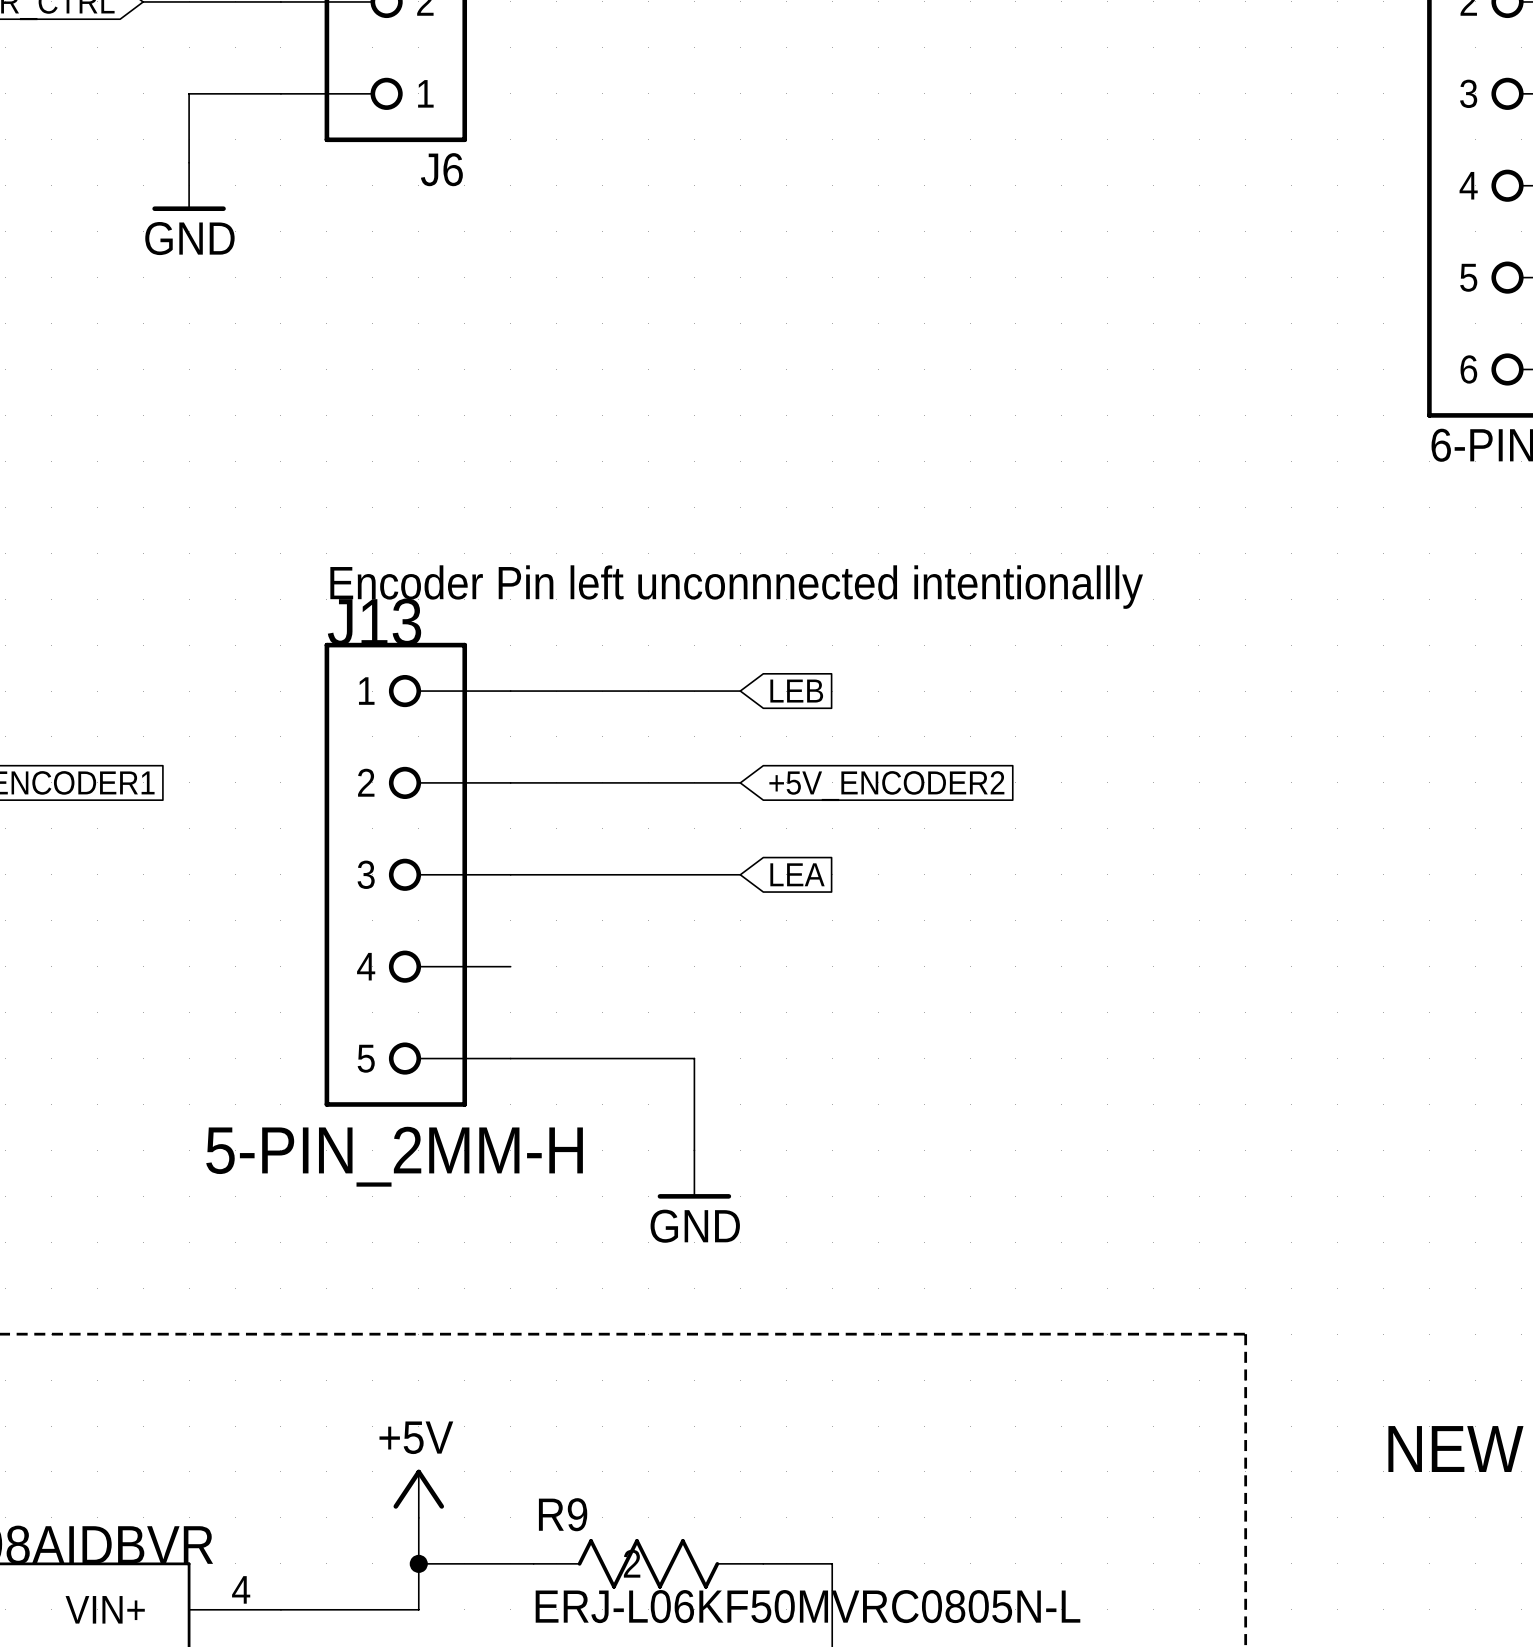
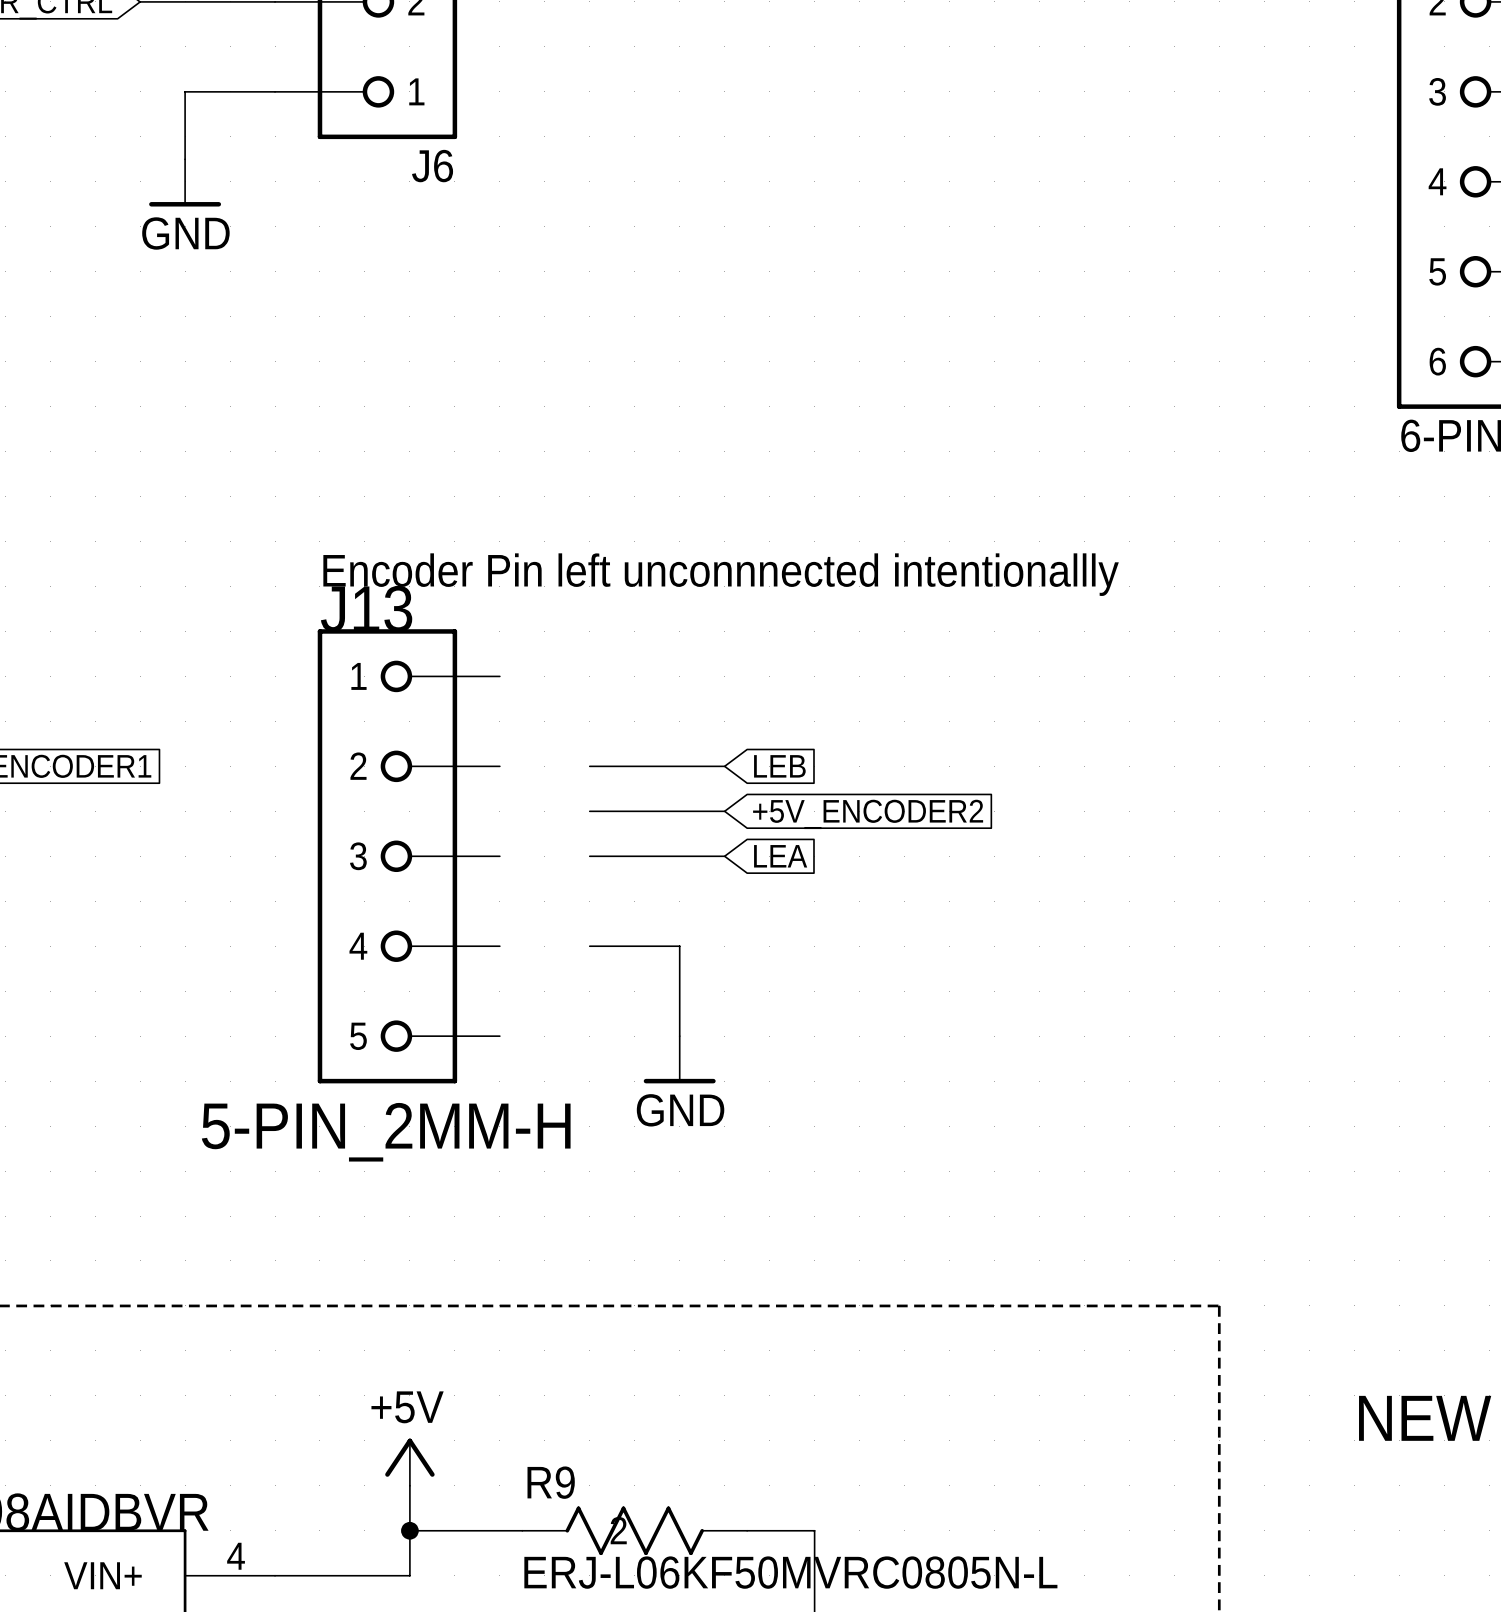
wire: (510, 691) (740, 691) -> none
global label: LEB (796, 691) -> none
wire: (510, 782) (602, 782) -> none
global label: +5V_ENCODER2 (886, 786) -> LEB (779, 766)
wire: none -> (589, 811) (724, 811)
global label: none -> +5V_ENCODER2 (868, 814)
wire: (510, 874) (602, 874) -> none
wire: none -> (589, 946) (679, 946) (679, 1036)
wire: (510, 1058) (694, 1058) (694, 1150) -> none
power symbol position: GND (694, 1174) -> GND (679, 1059)

